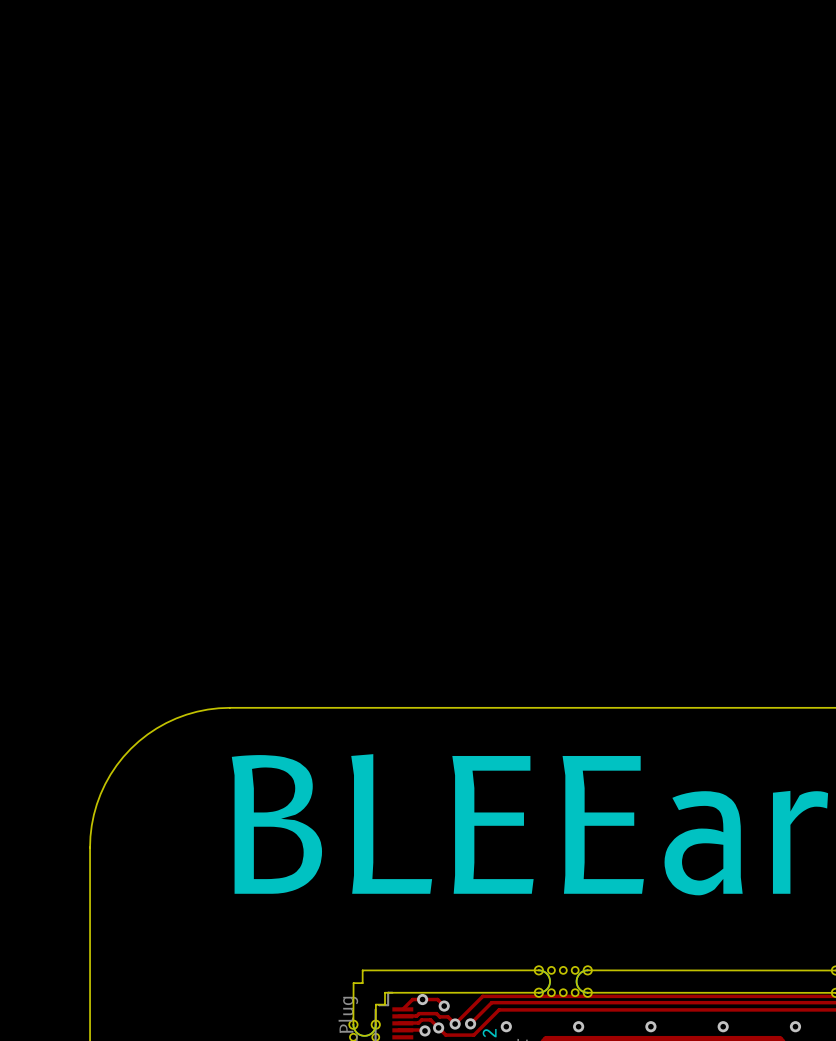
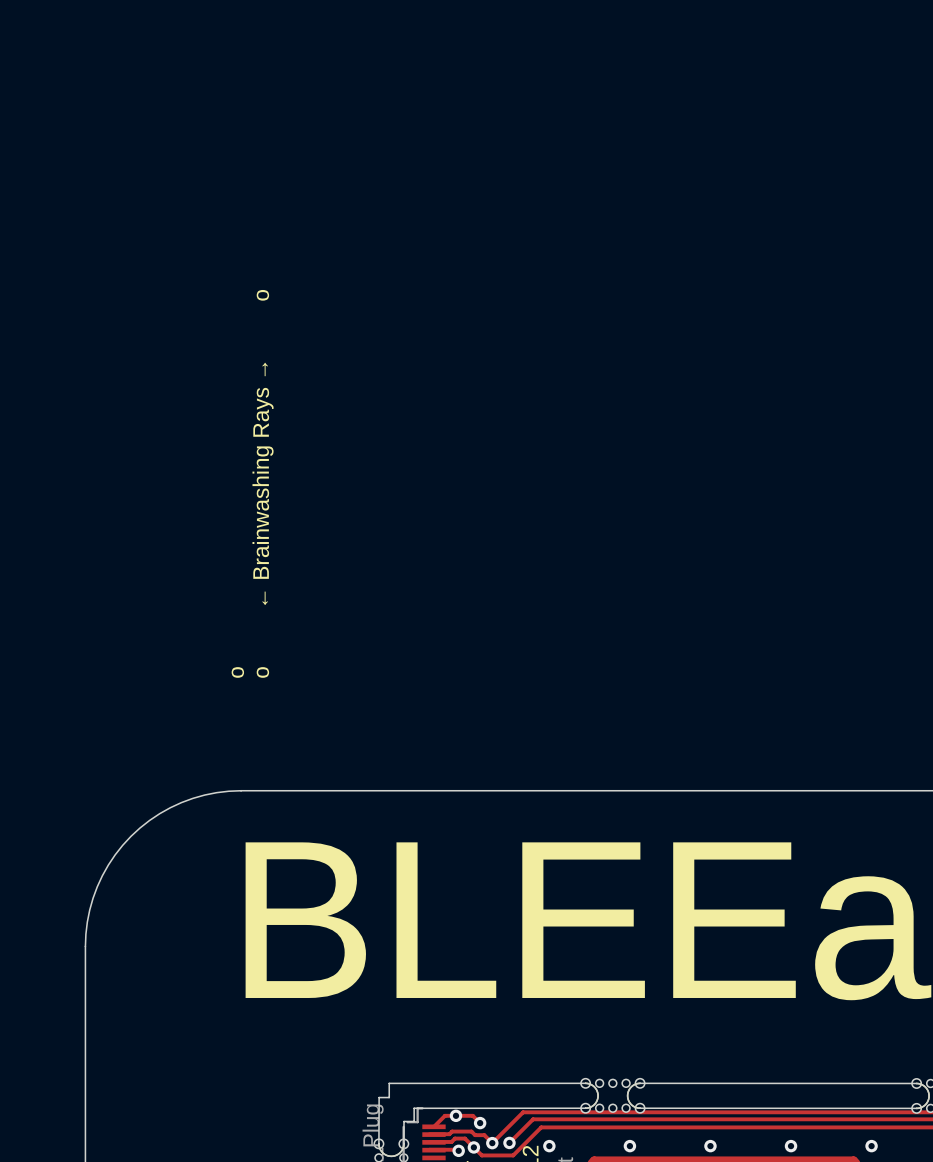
text: none -> o ← Brainwashing Rays → o (263, 483)
text: none -> o (237, 672)

